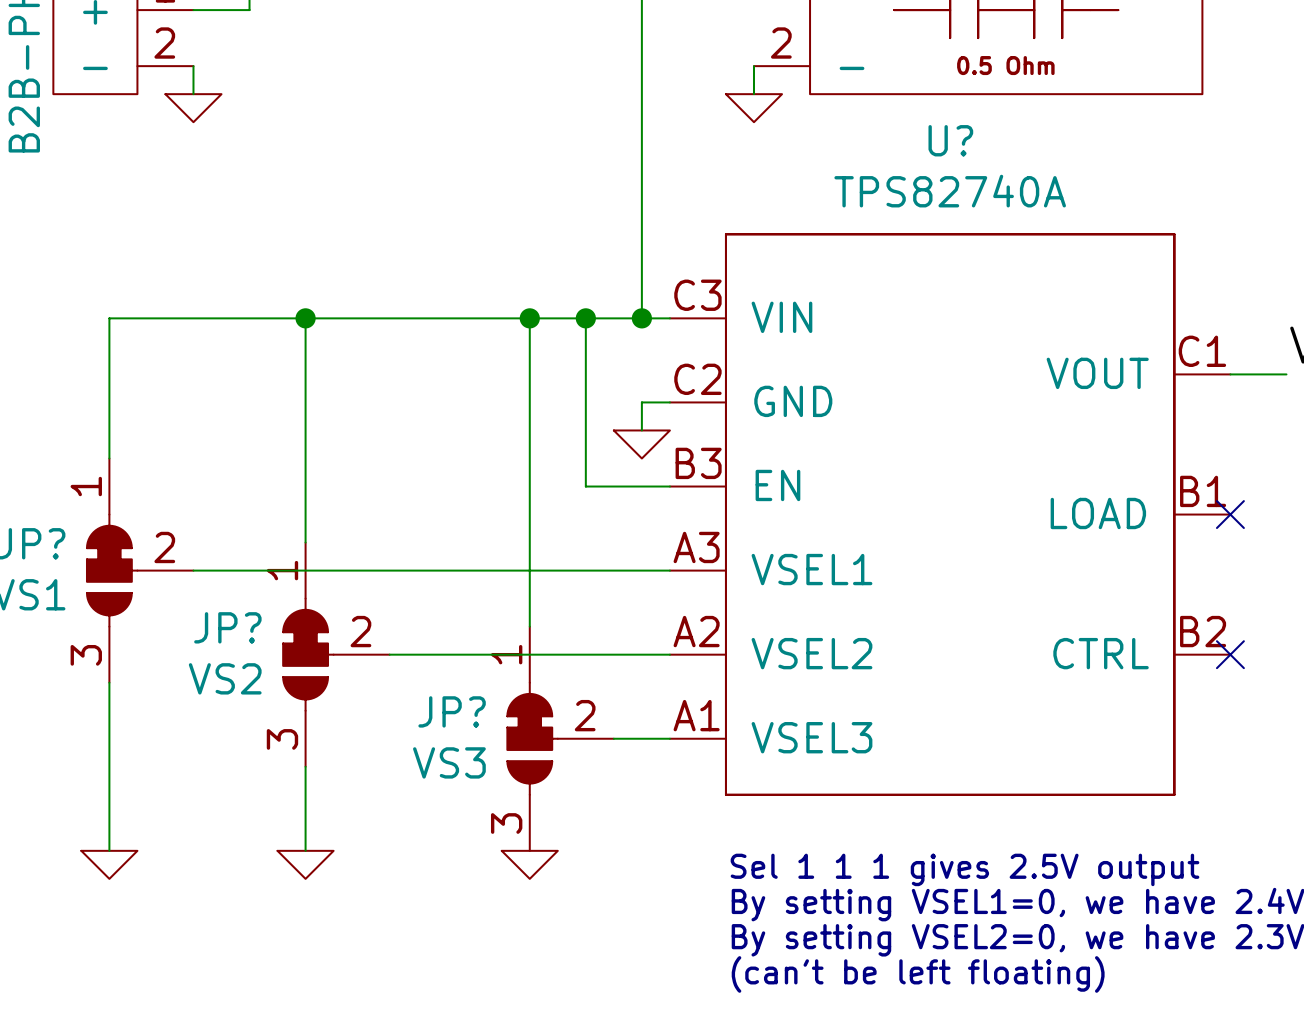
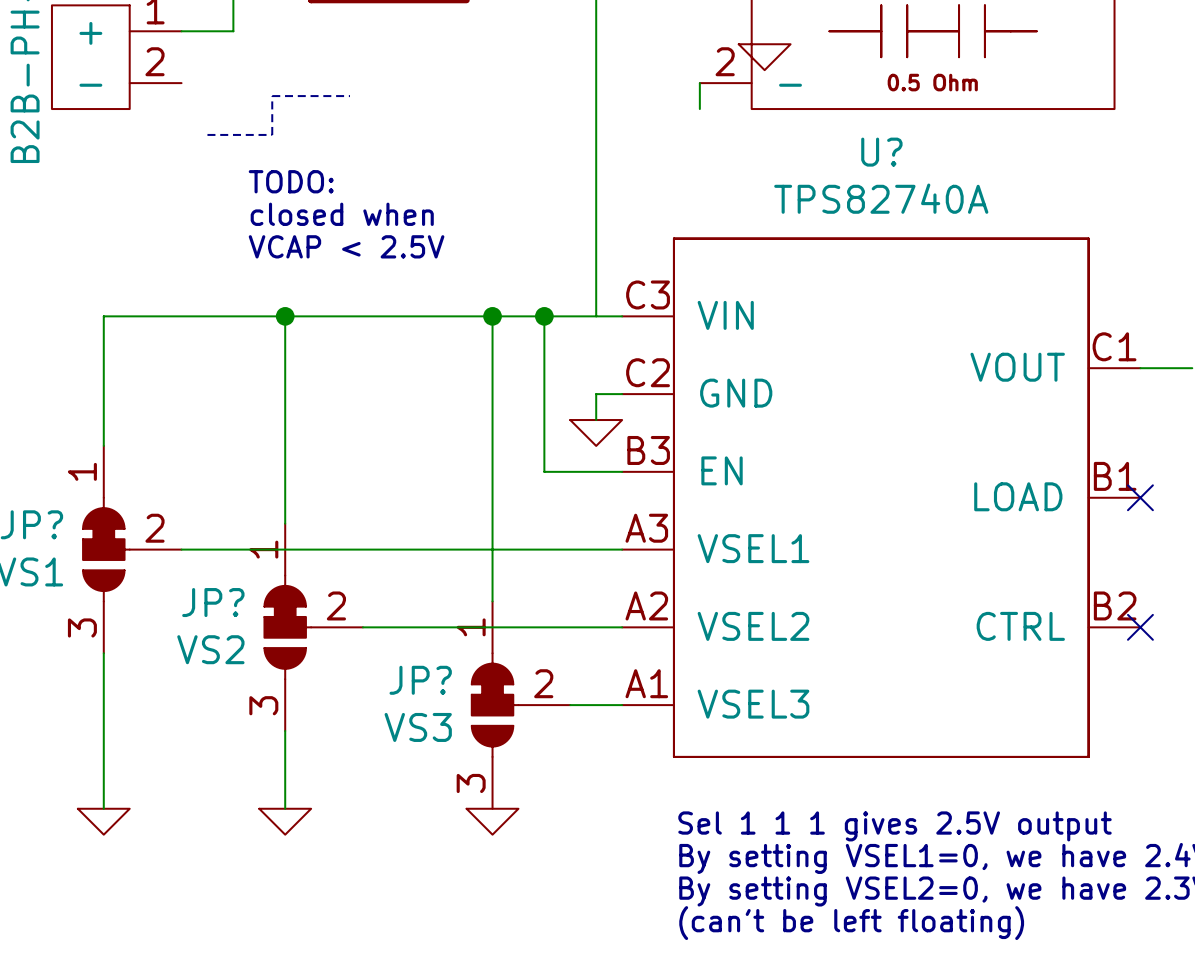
wire: (193, 66) (193, 94) -> none
line: none -> (349, 96) (272, 96) (272, 134) (207, 134)
power symbol: (193, 108) -> none
power symbol position: (753, 108) -> (764, 57)
text: none -> TODO: (291, 181)
text: none -> closed when (342, 214)
text: none -> VCAP < 2.5V (346, 246)
junction: (641, 318) -> none

